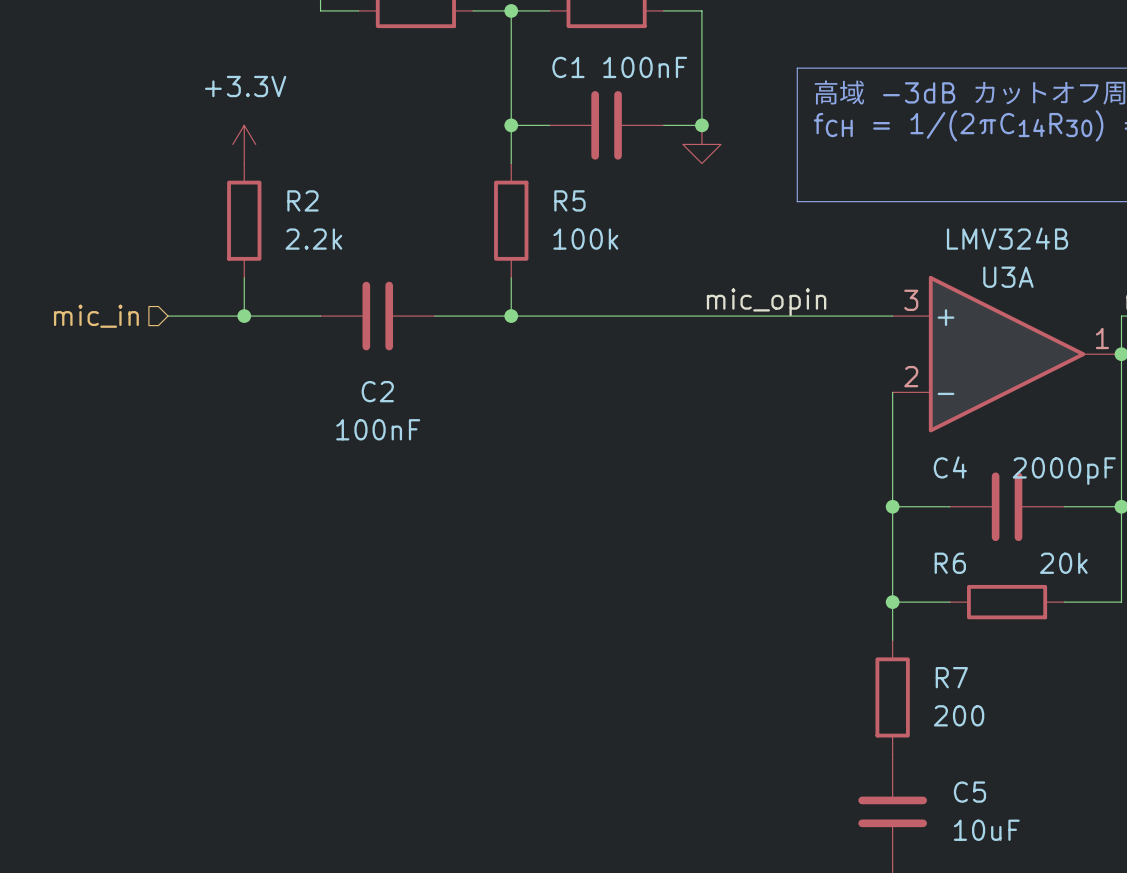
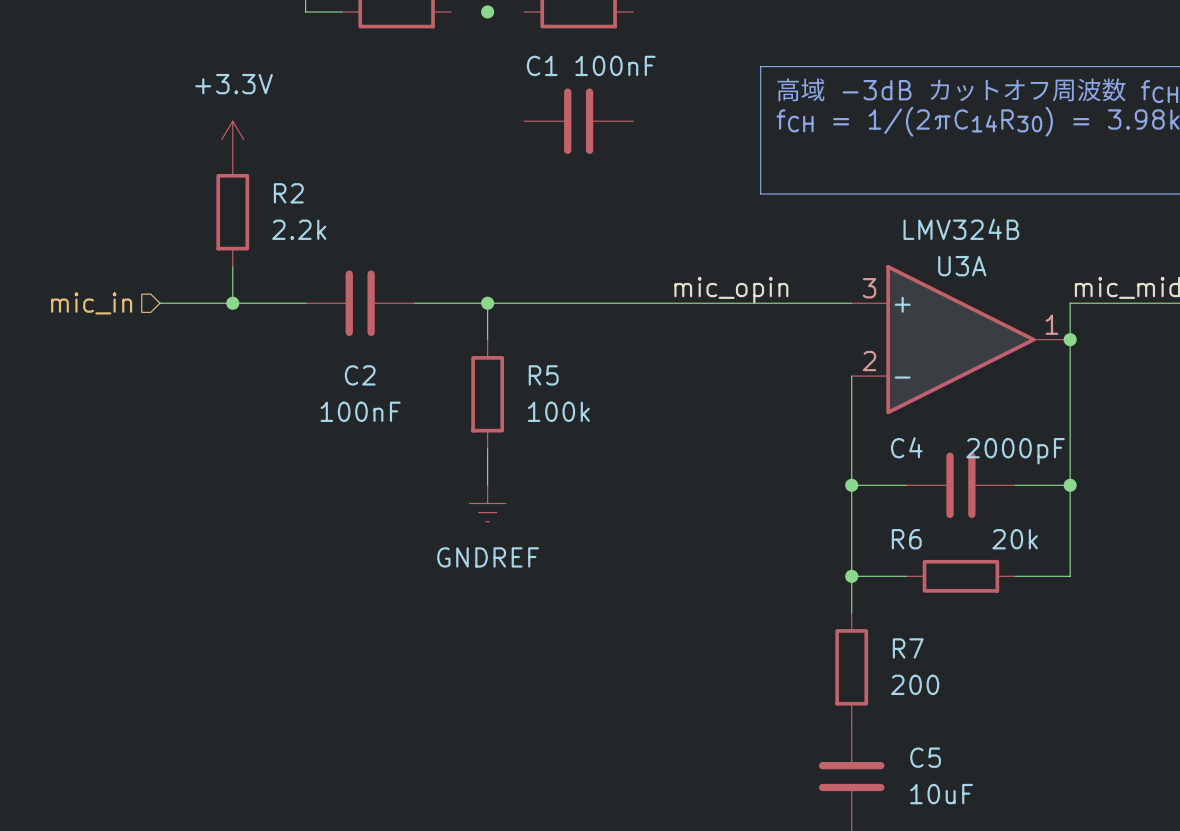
wire: (473, 10) (549, 10) -> none
wire: (511, 10) (511, 163) -> none
wire: (663, 10) (701, 10) (701, 125) (663, 125) -> none
wire: (511, 125) (549, 125) -> none
junction: (511, 125) -> none
junction: (701, 125) -> none
power symbol: (701, 144) -> none
R5 position: (511, 220) -> (487, 394)
wire: (511, 277) (511, 316) -> (487, 339) (487, 303)
wire: none -> (487, 448) (487, 485)
power symbol: none -> GNDREF (487, 503)

